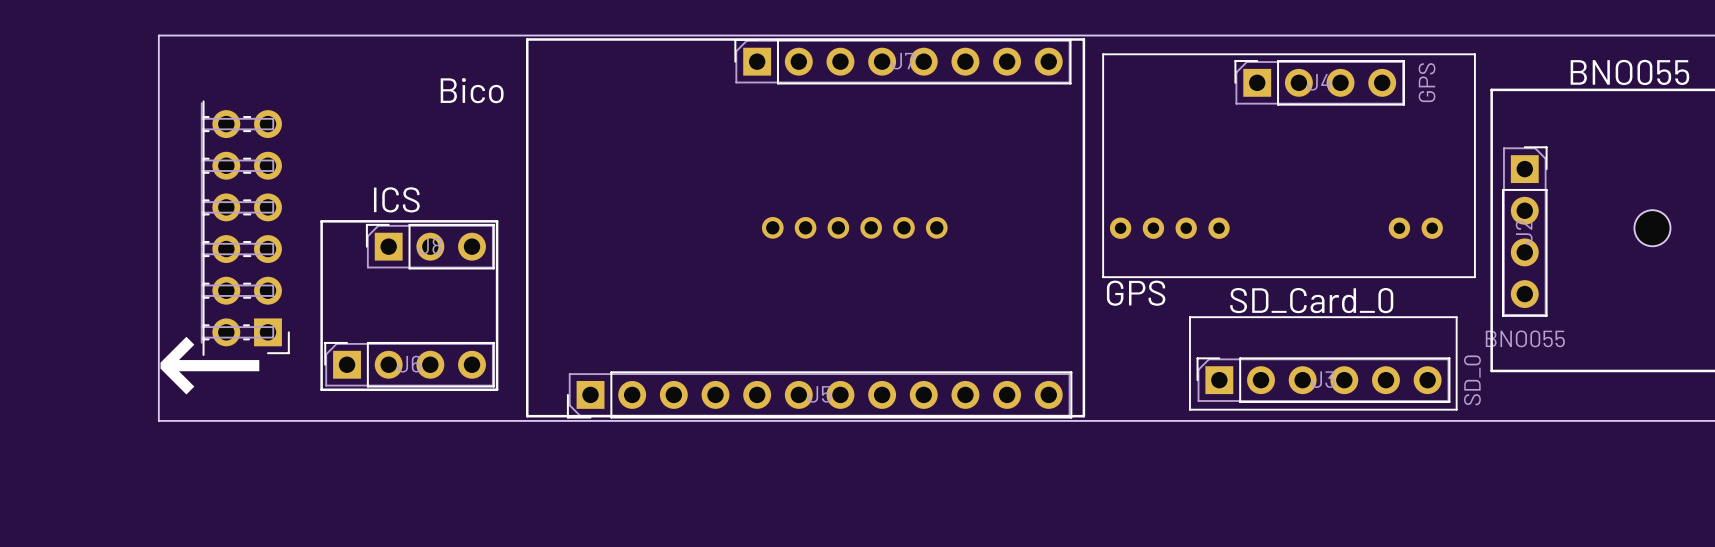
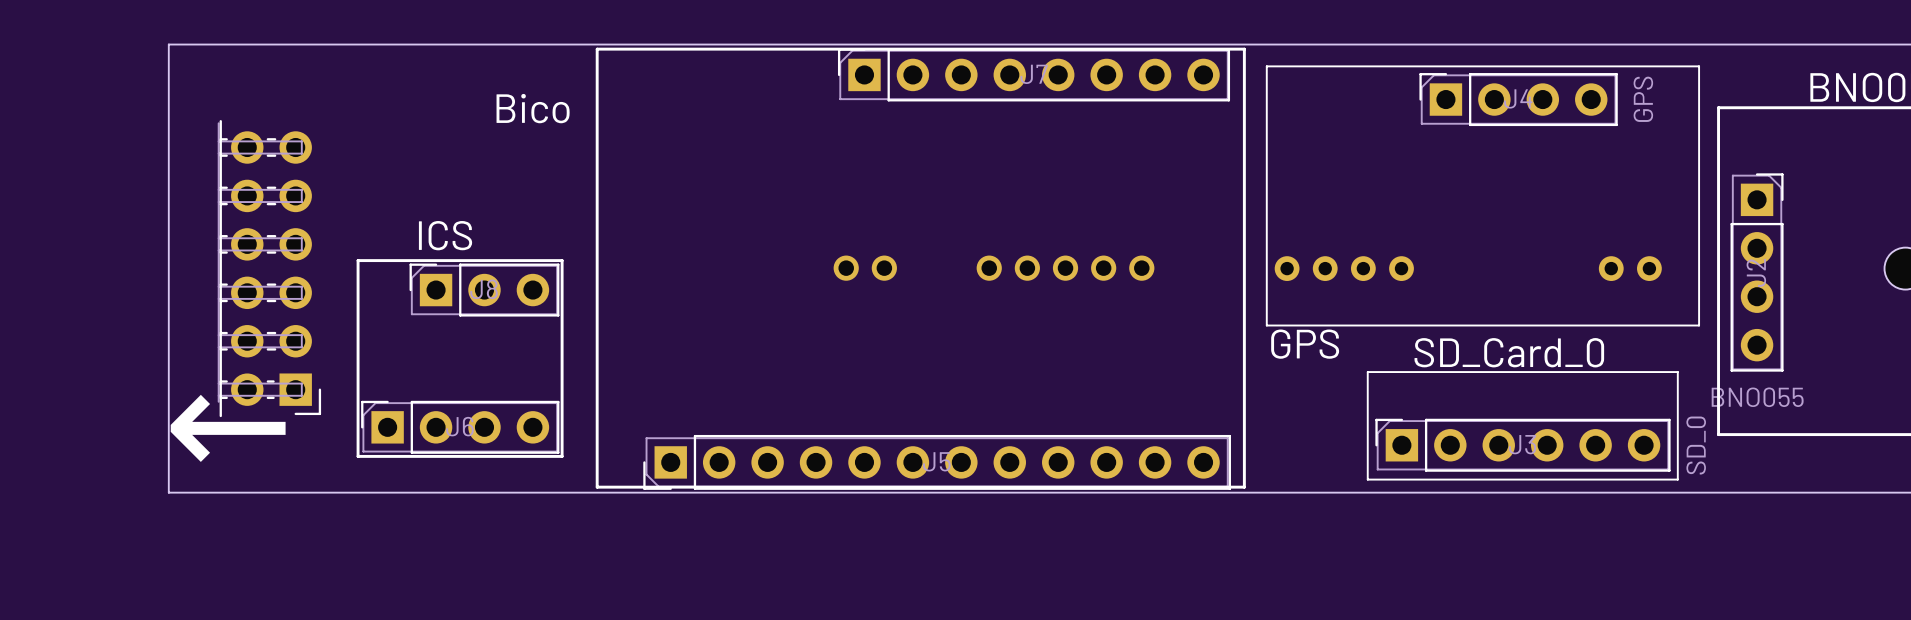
part: none -> (865, 268)
part: (854, 227) -> none
part: none -> (1065, 268)

